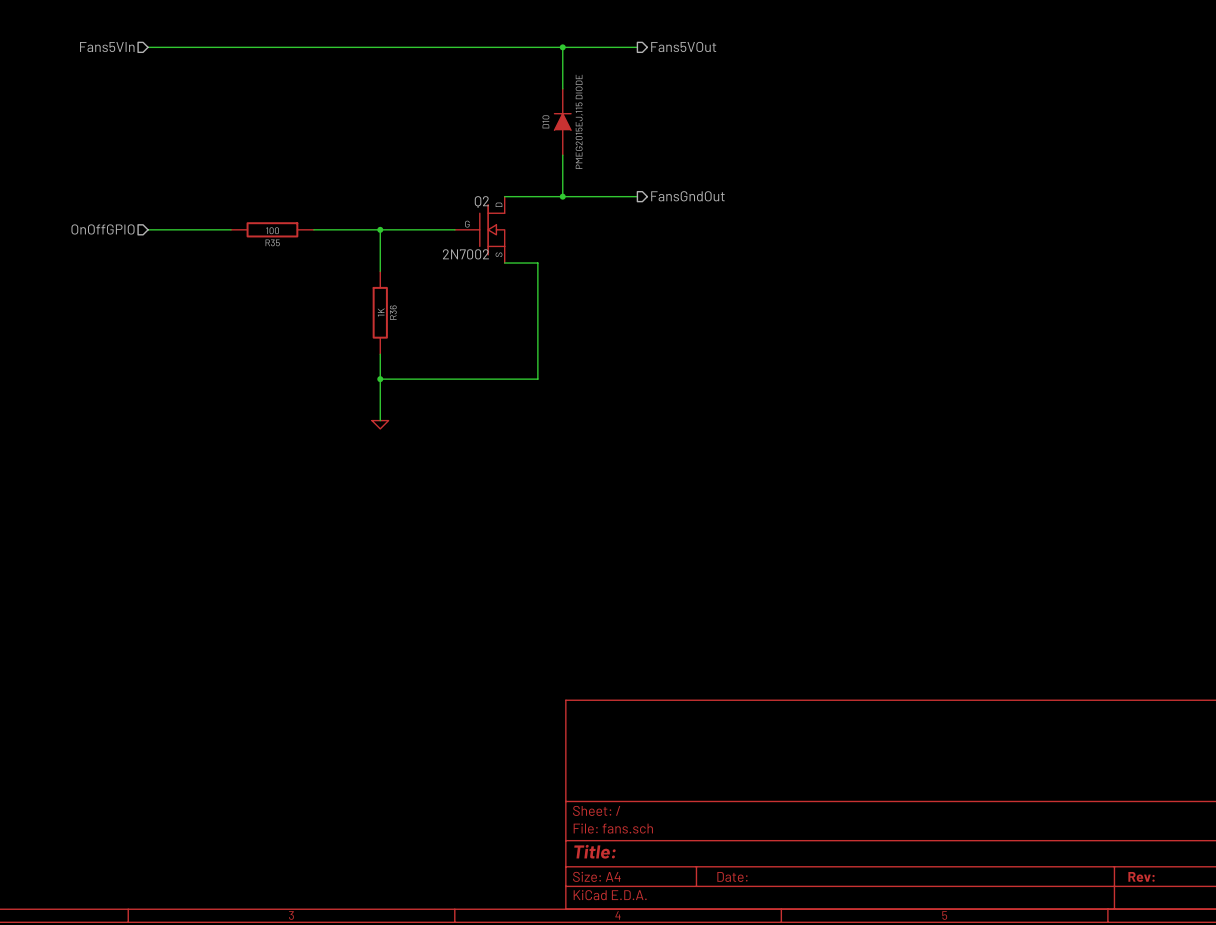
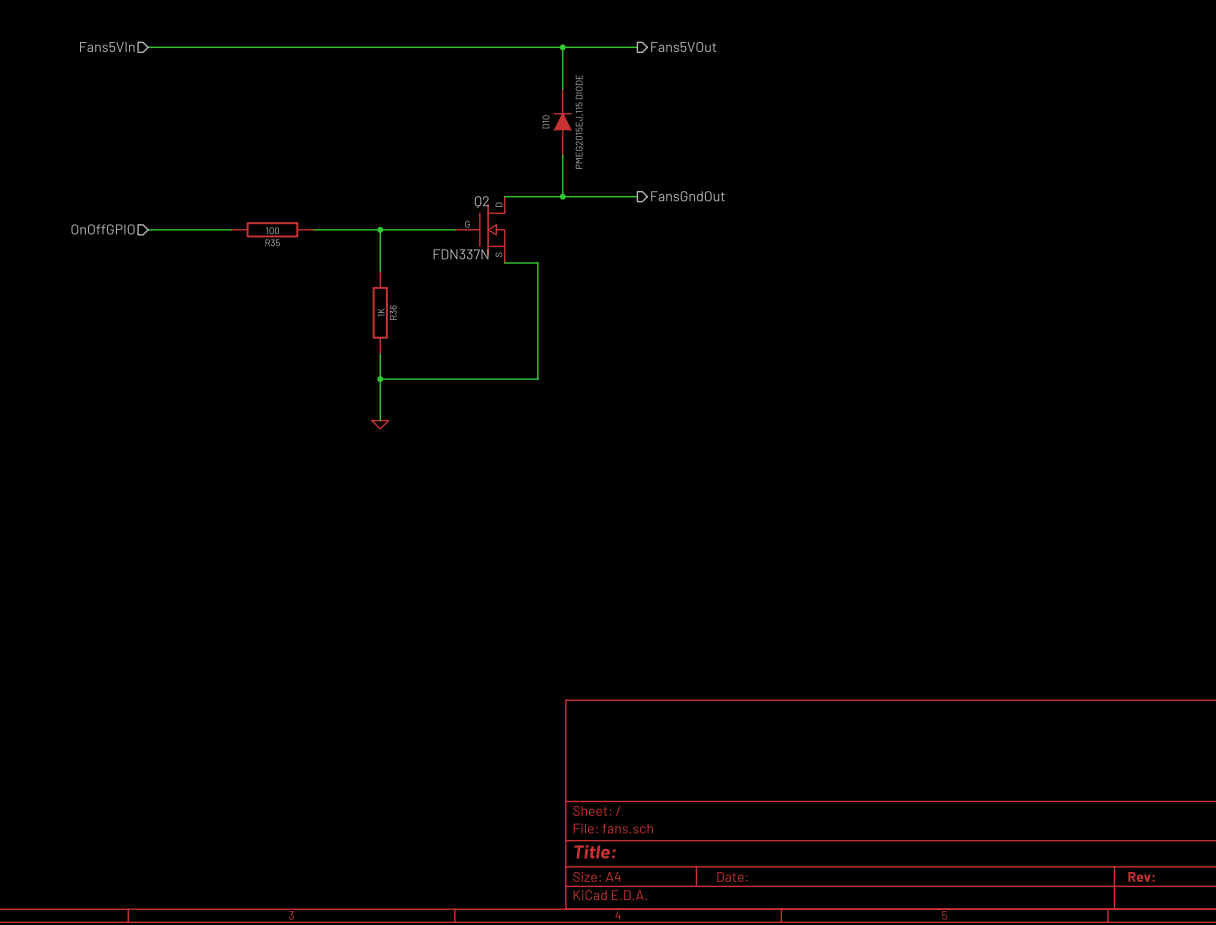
Q2 value: 2N7002 (465, 254) -> FDN337N (461, 254)

